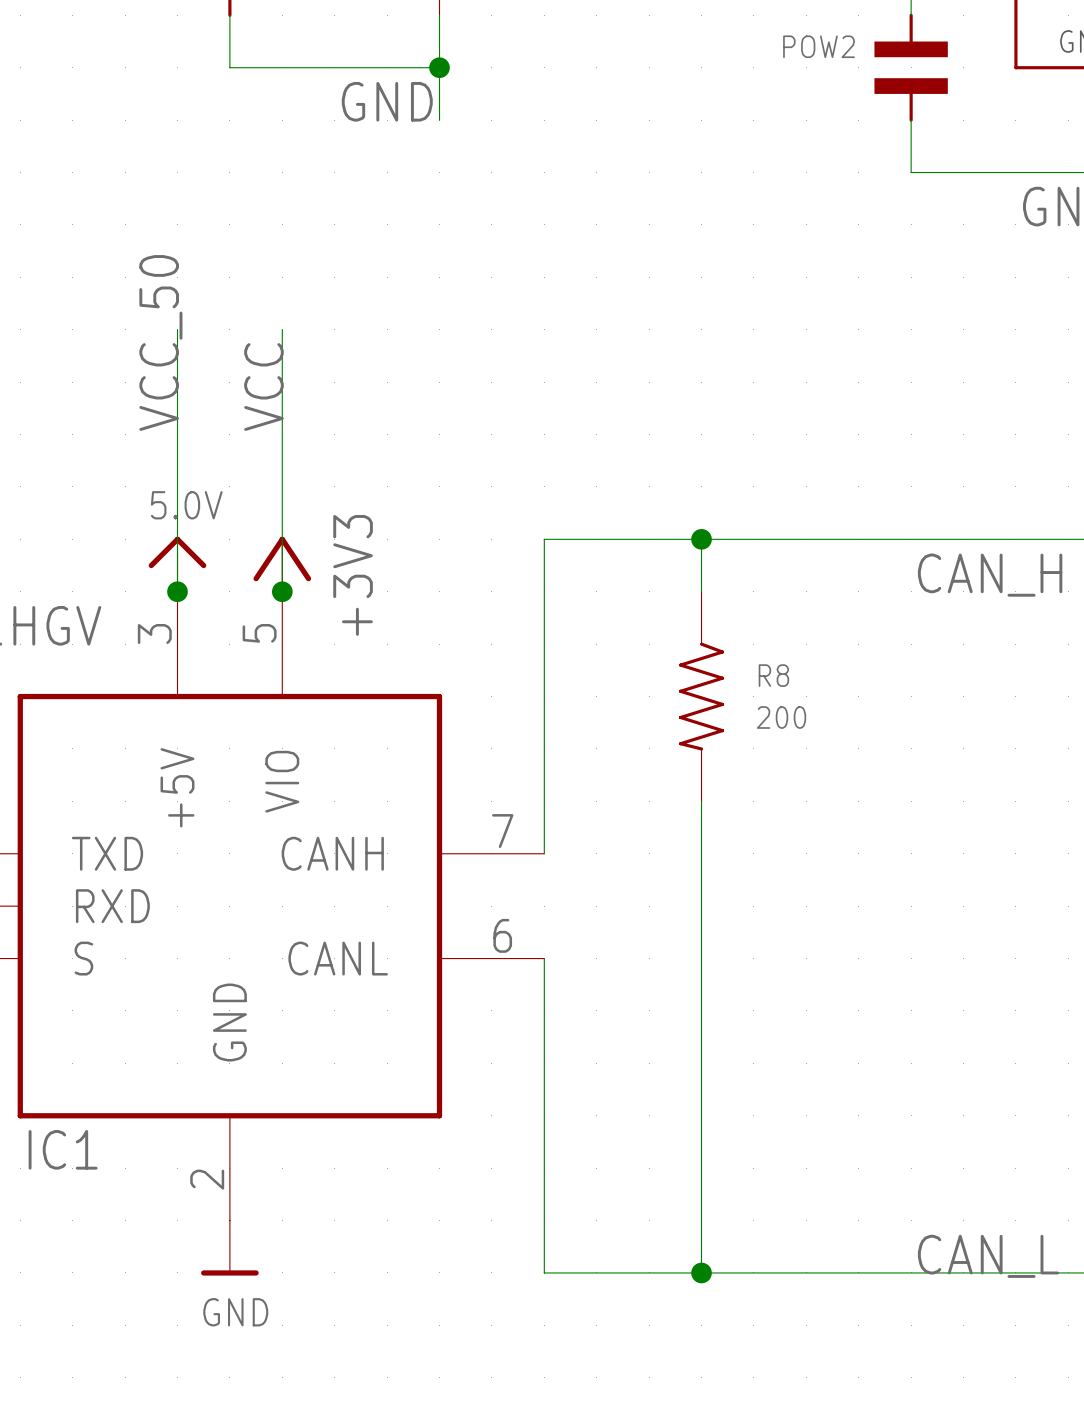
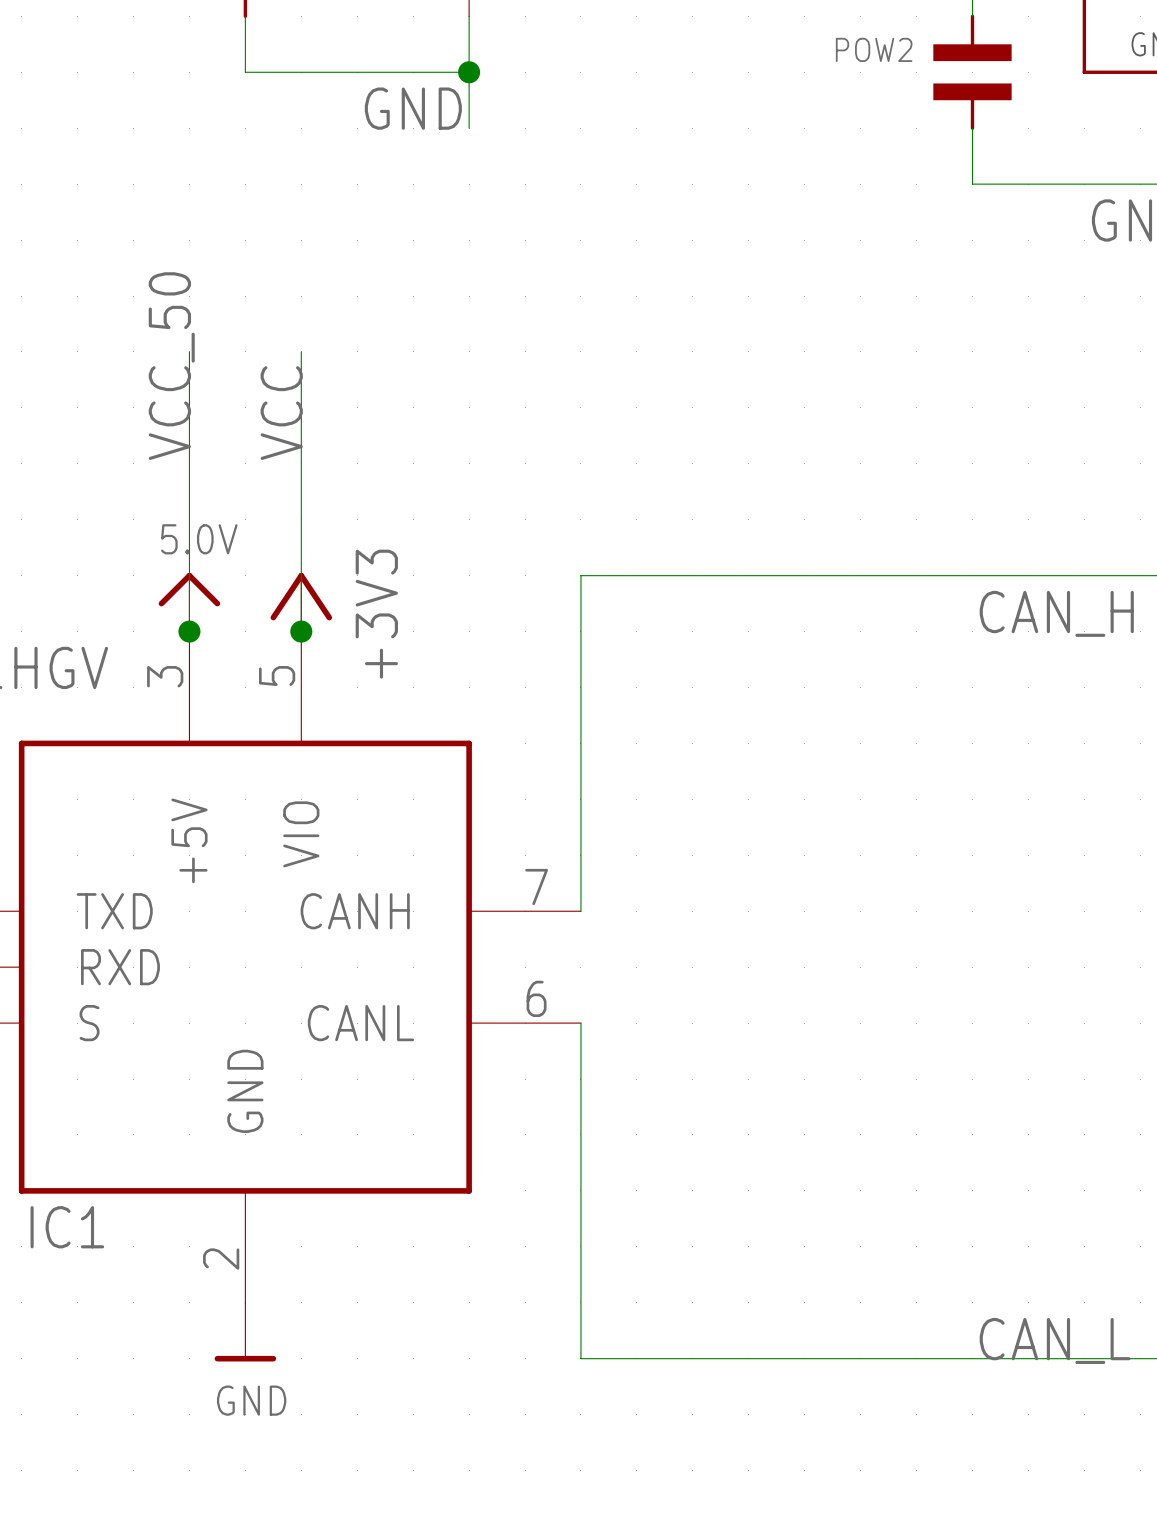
wire: (701, 539) (701, 591) -> none
junction: (701, 539) -> none
R8: 200 (701, 696) -> none
wire: (701, 801) (701, 1272) -> none
junction: (701, 1272) -> none

